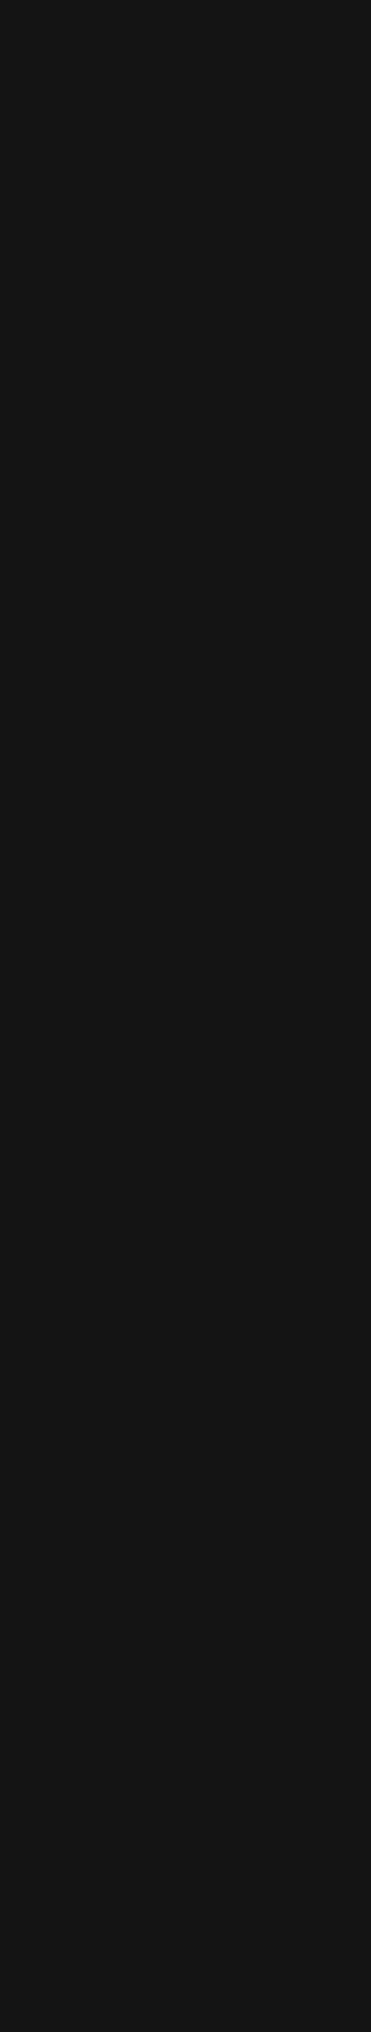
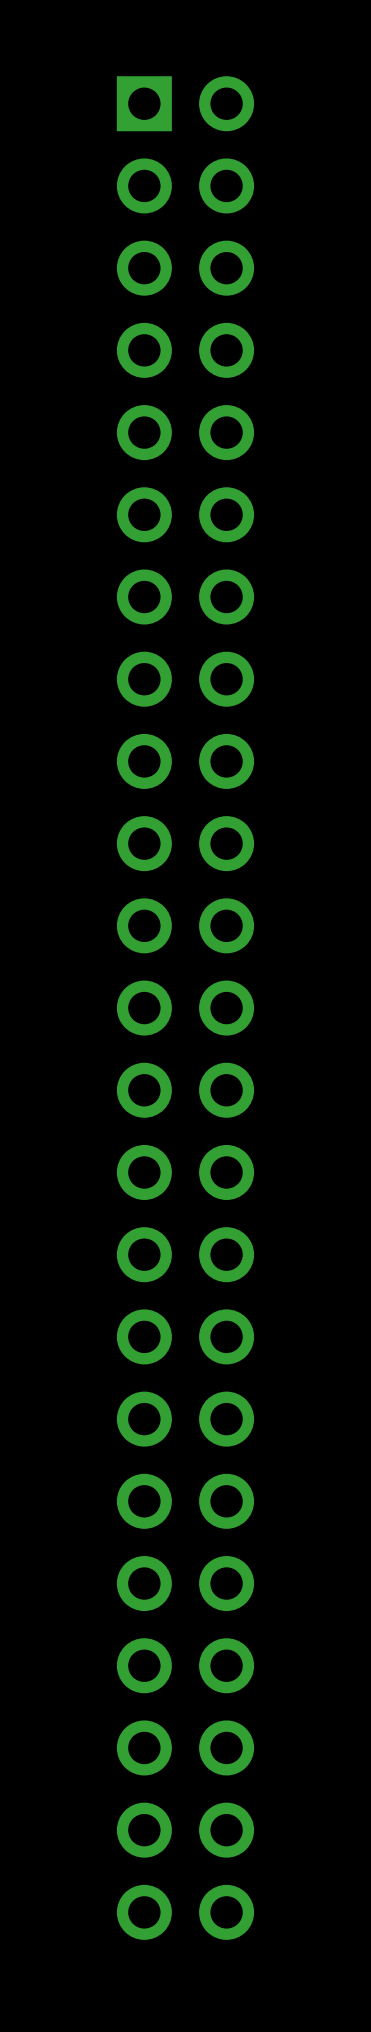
part: none -> (185, 1008)

